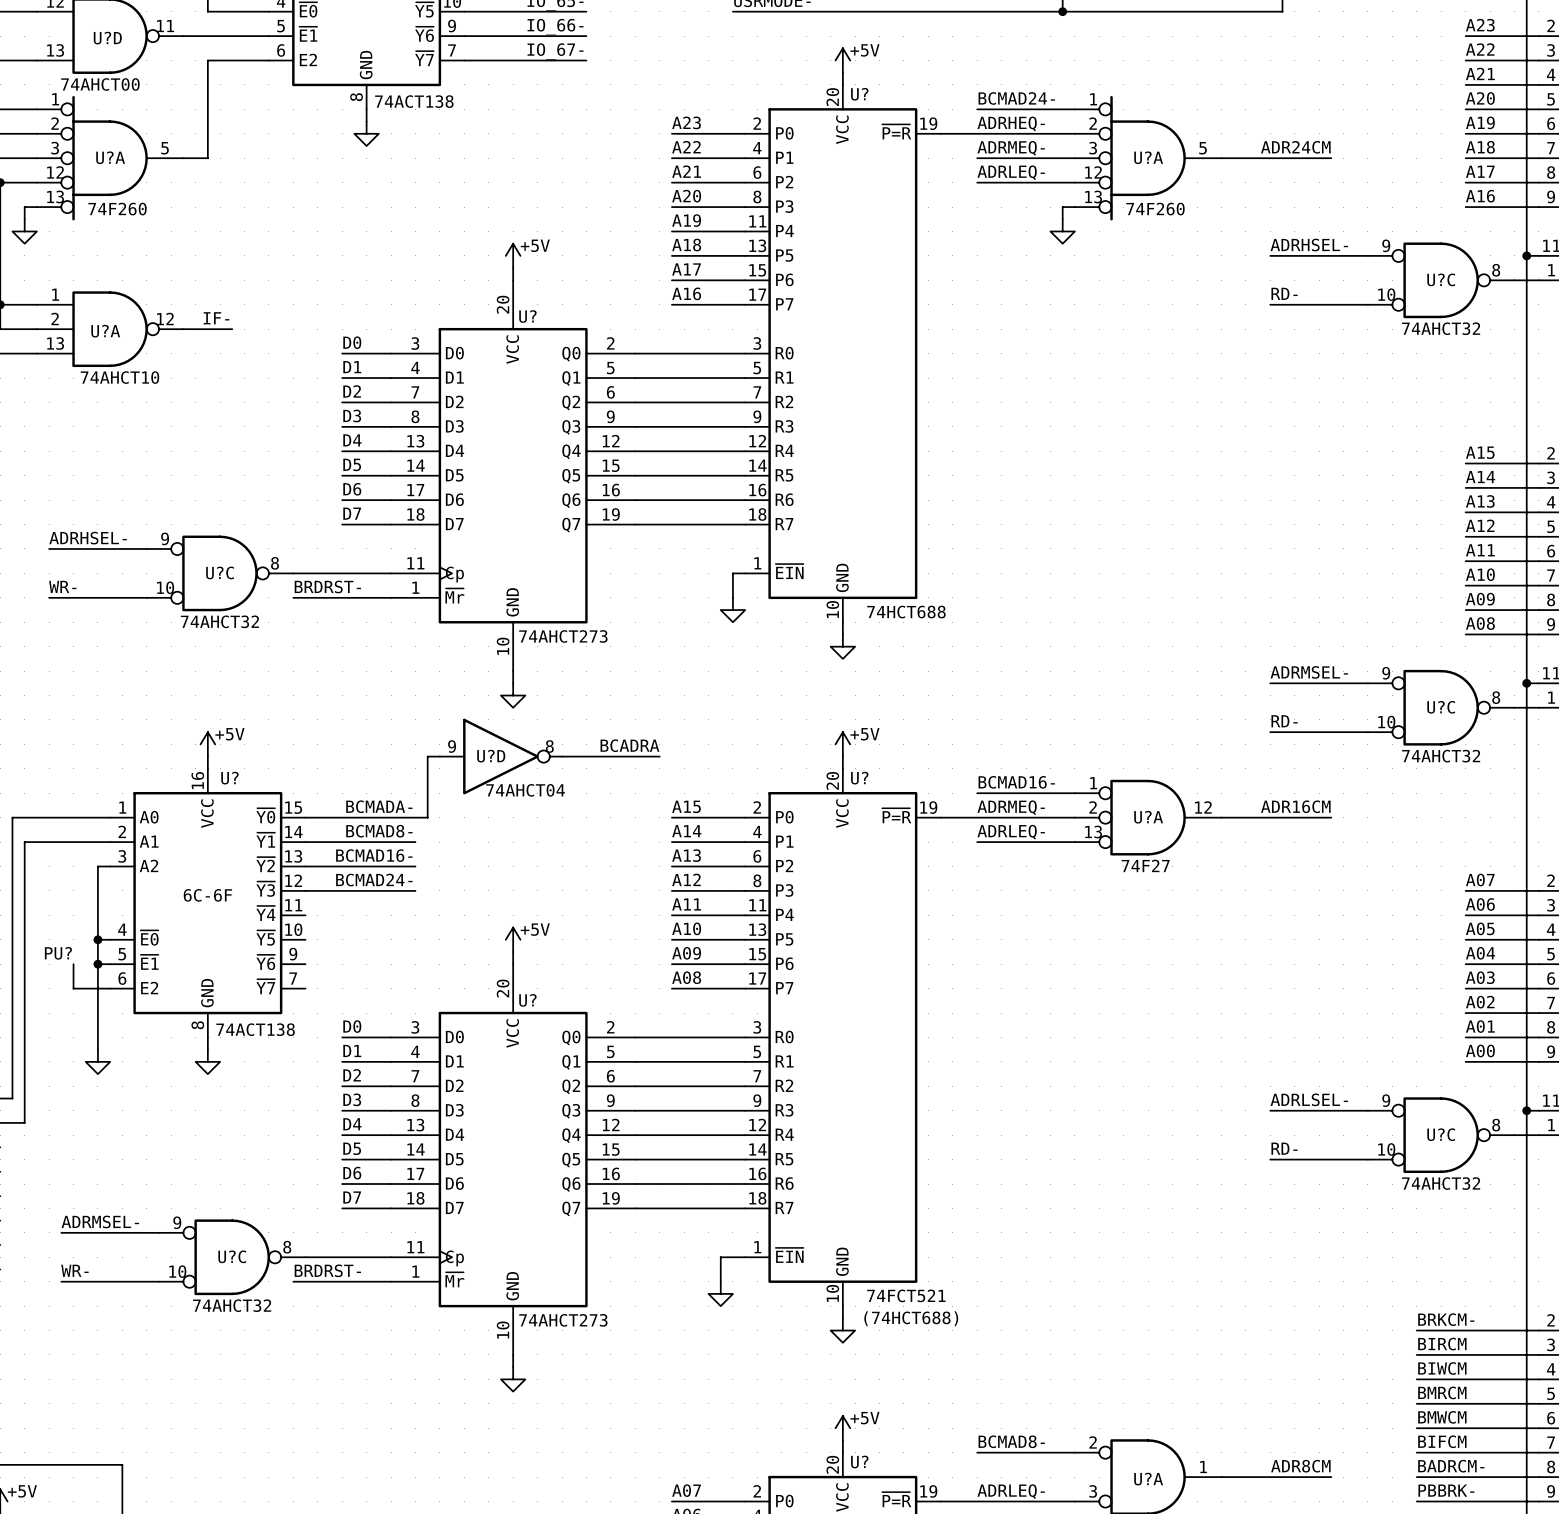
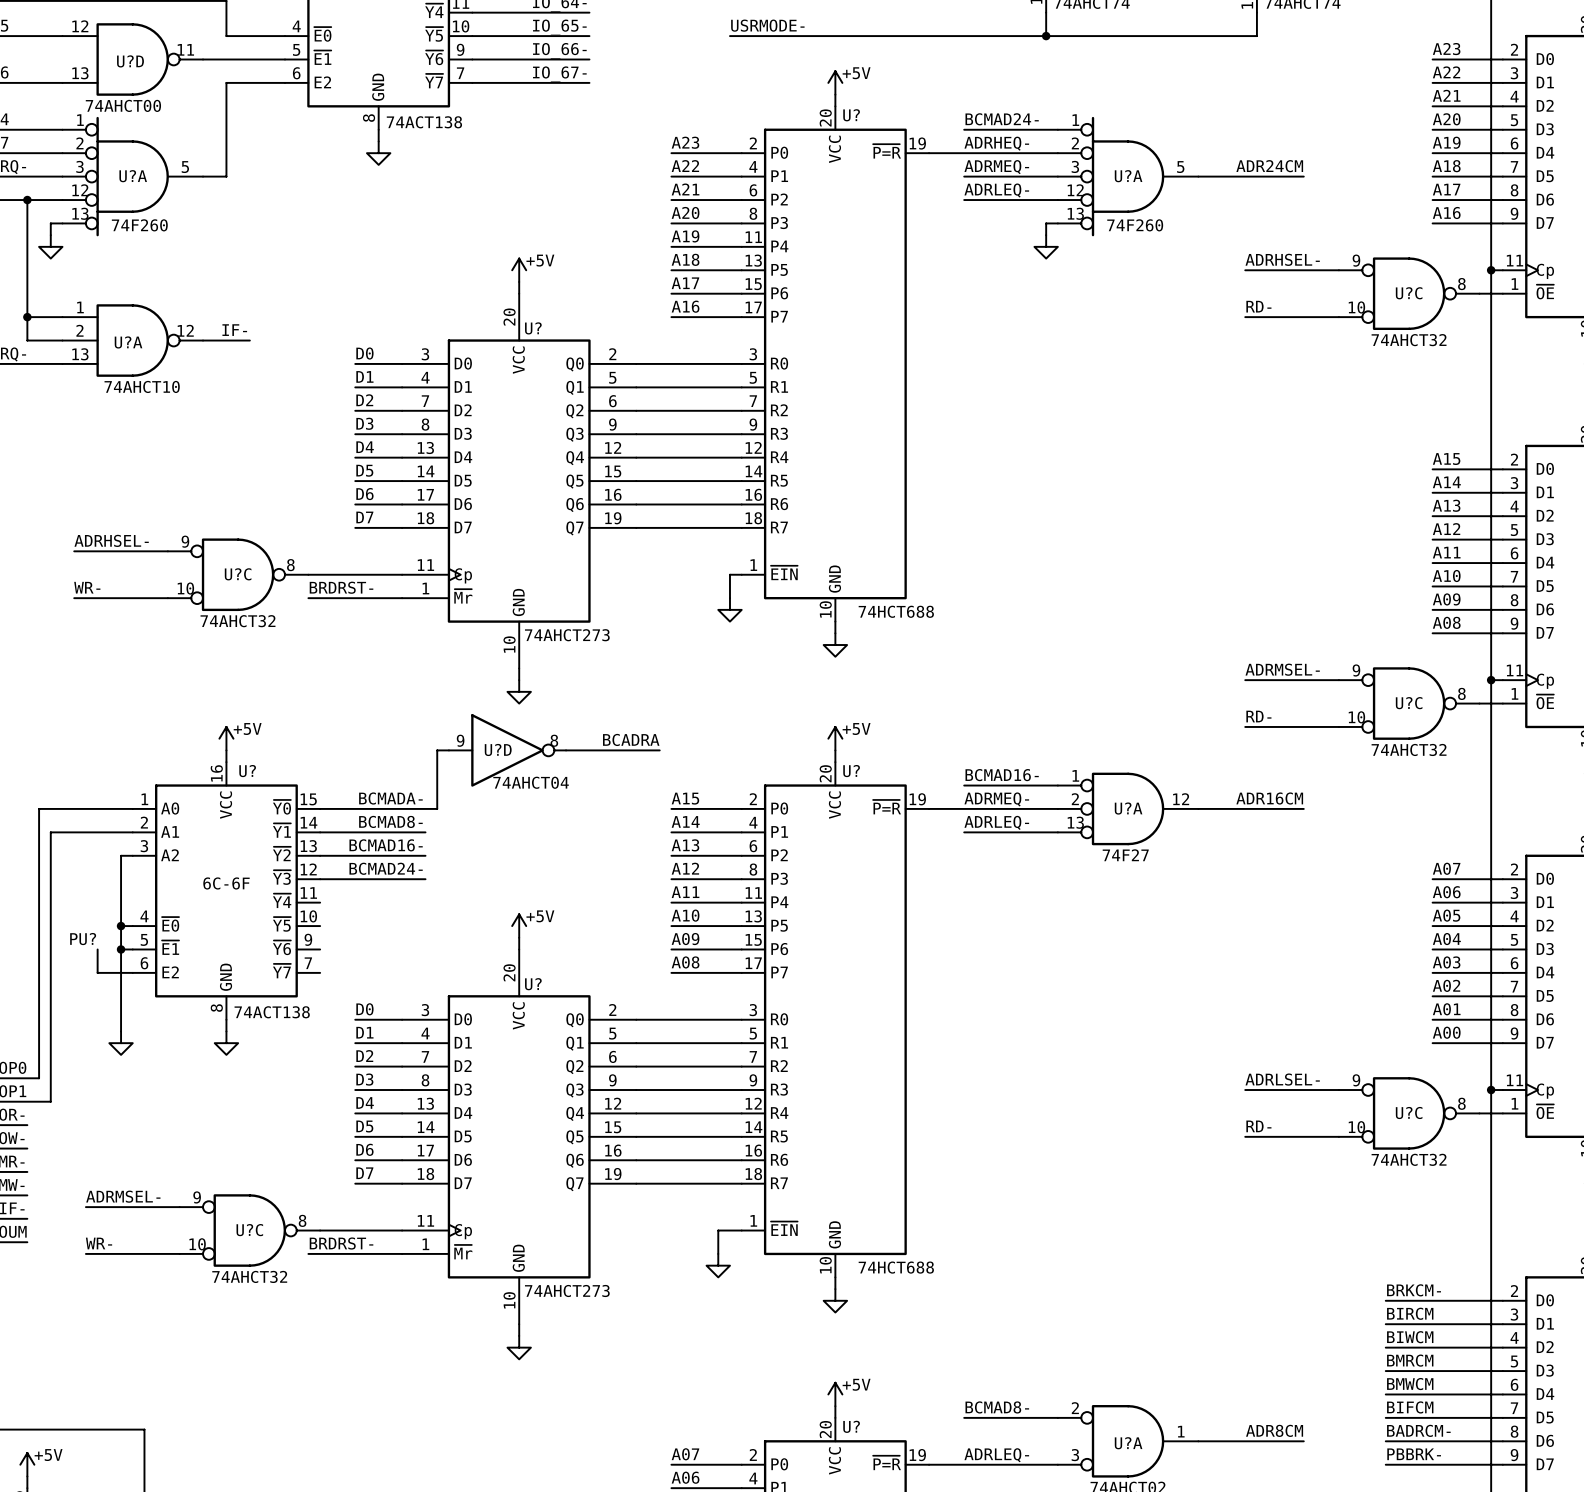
U? value: 74FCT521 (906, 1295) -> 74HCT688 (896, 1267)
U? text: (74HCT688) (911, 1318) -> none

